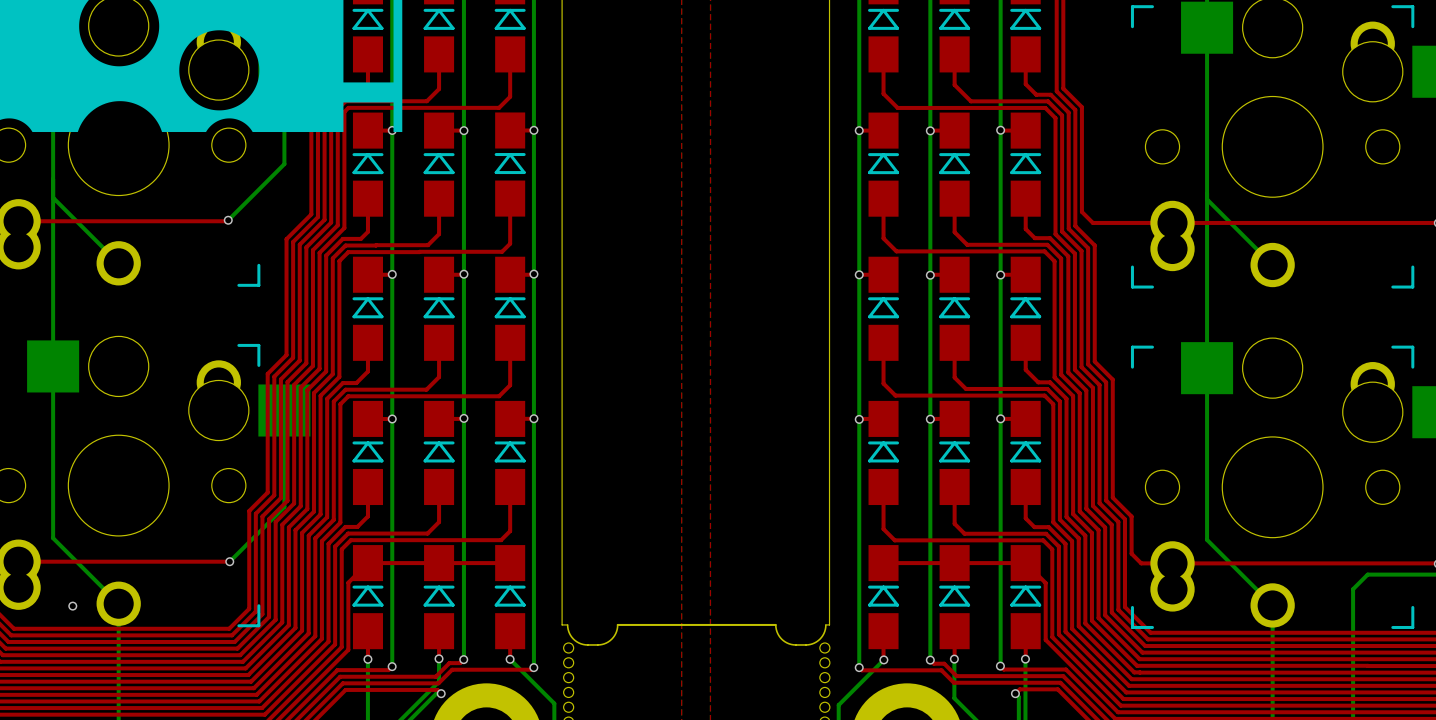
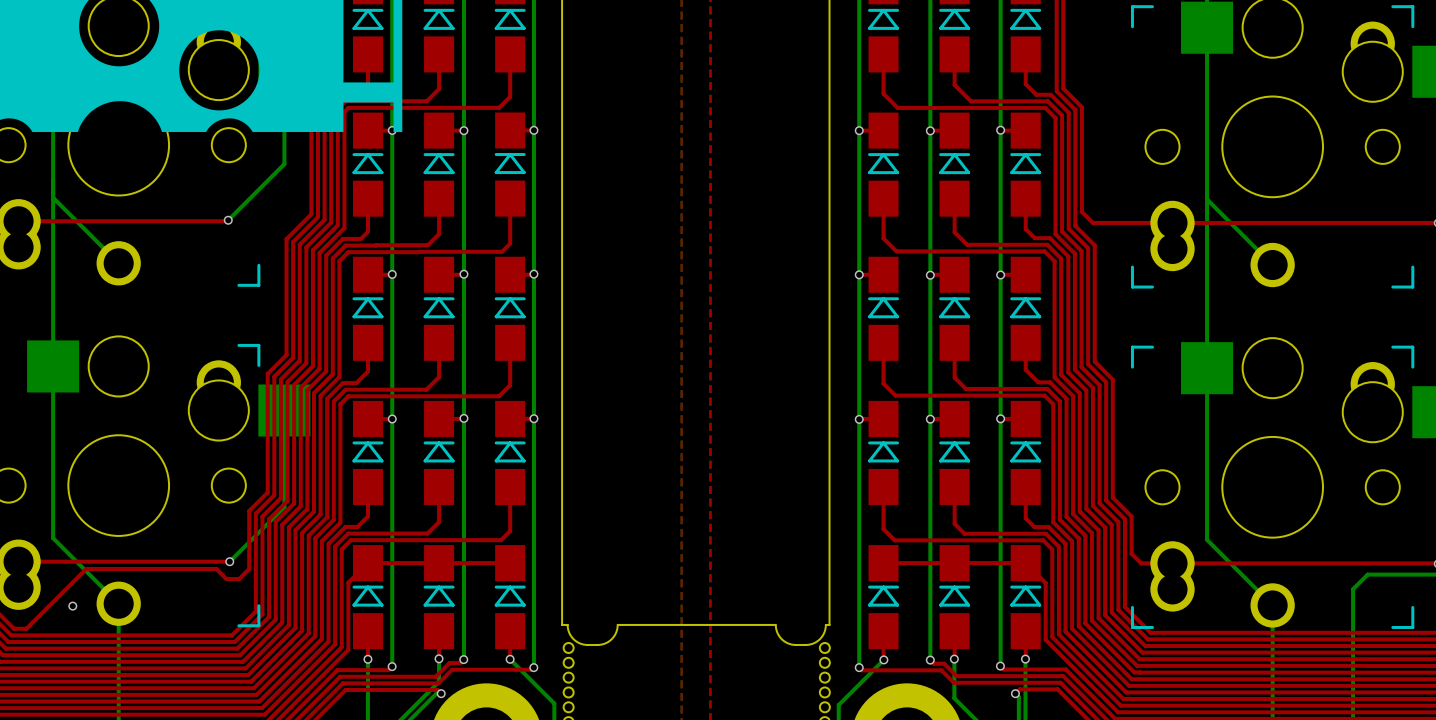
top track: (249, 569) (249, 608) (229, 628) (26, 628) -> (249, 569) (239, 579) (226, 579) (216, 569) (86, 569) (26, 628)

